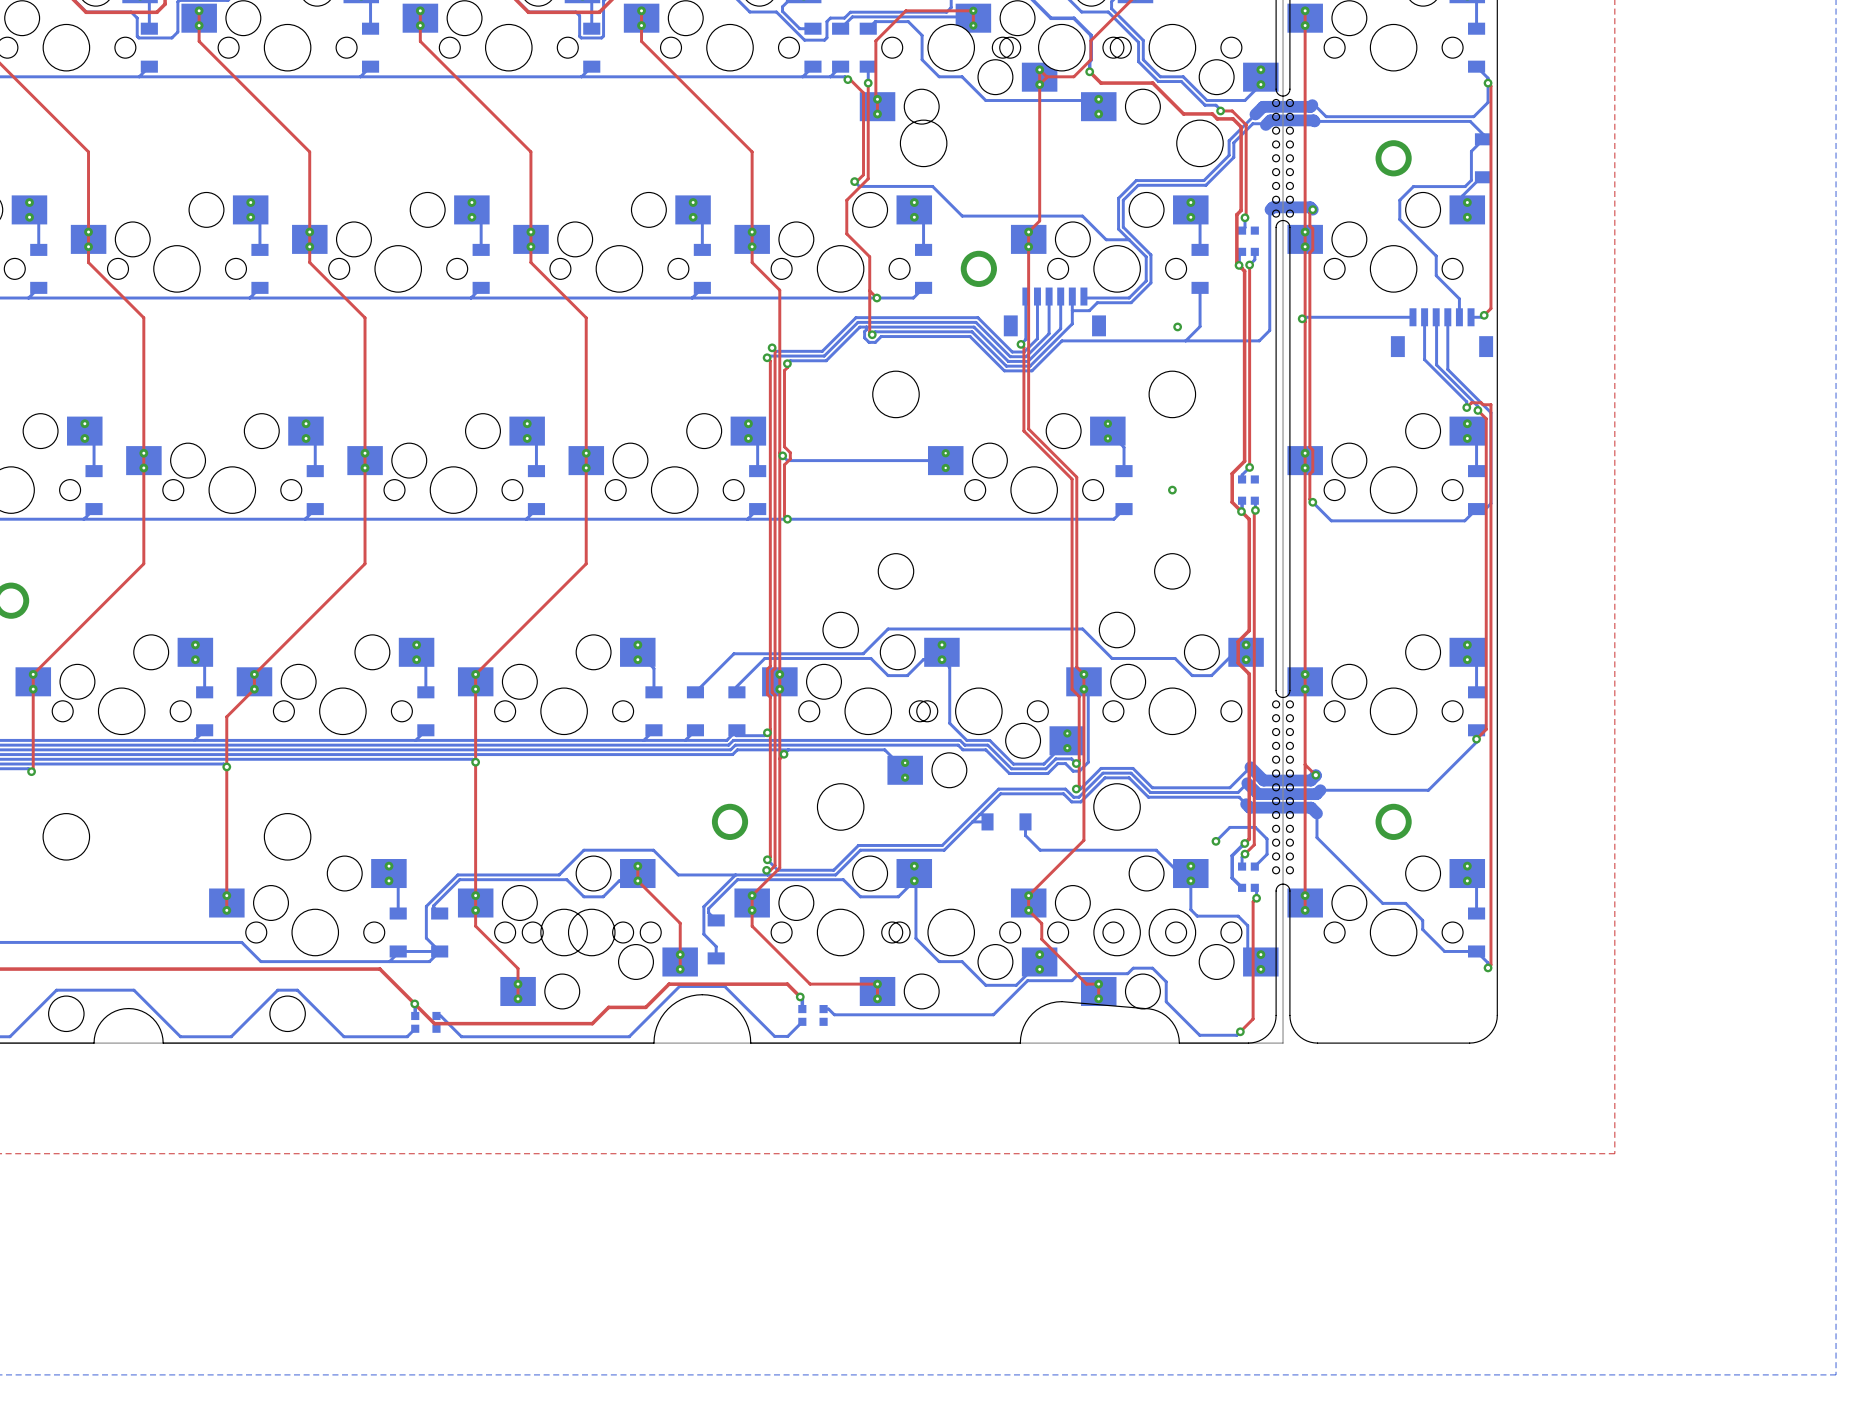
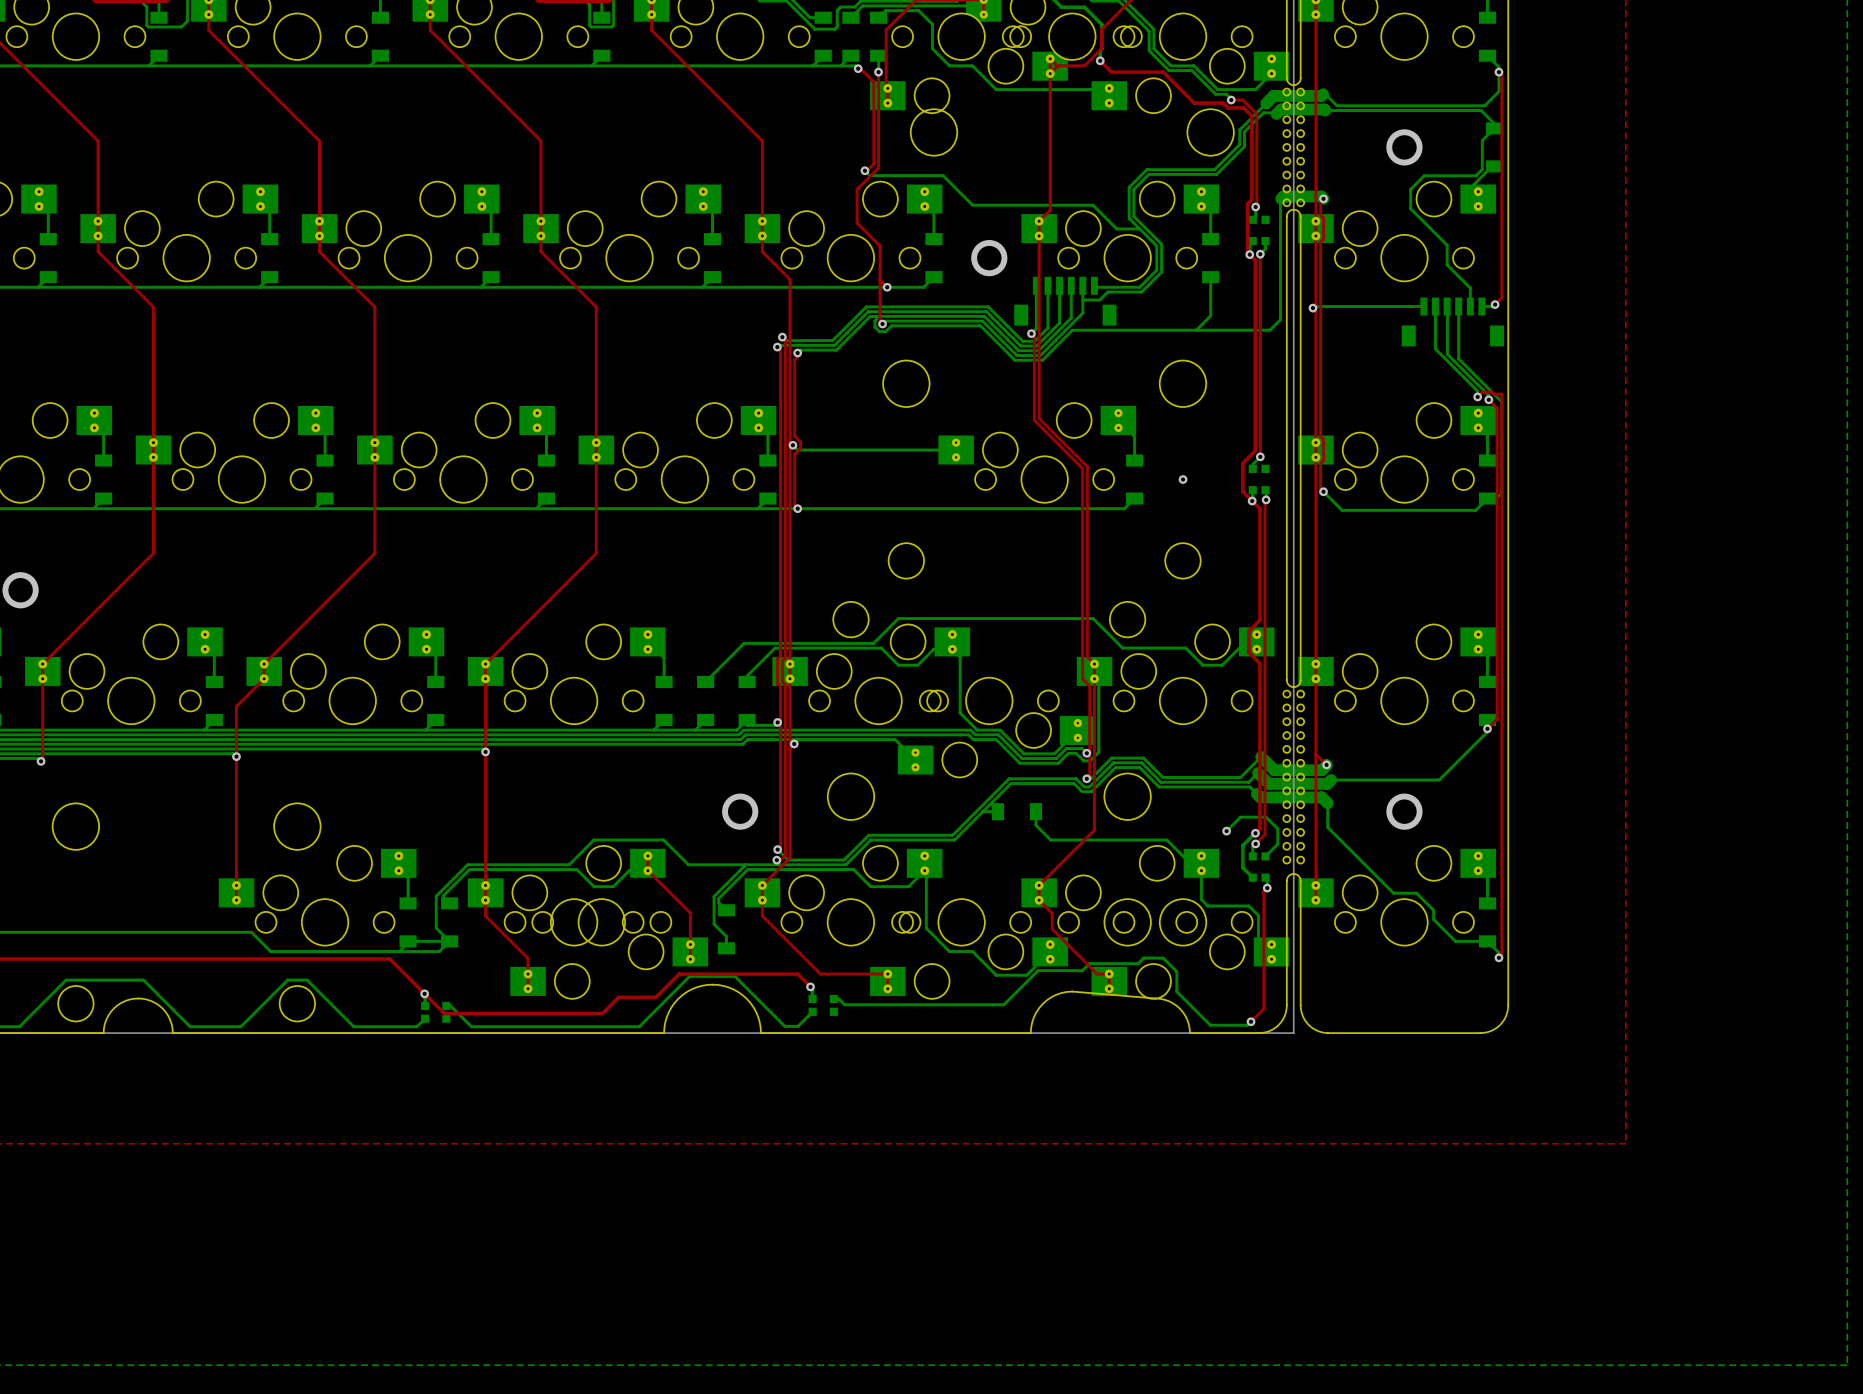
via: (1177, 326) -> none

